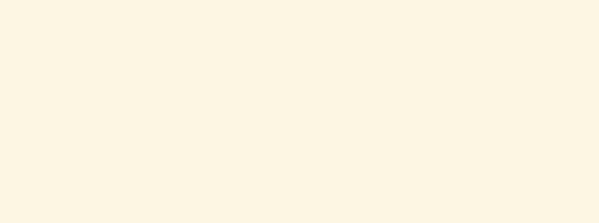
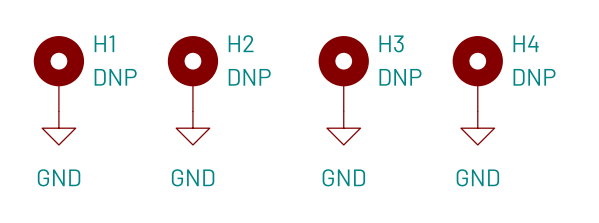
H1: none -> DNP (58, 73)
H2: none -> DNP (192, 73)
H3: none -> DNP (343, 73)
H4: none -> DNP (477, 73)
power symbol: none -> GND (58, 128)
power symbol: none -> GND (192, 128)
power symbol: none -> GND (343, 128)
power symbol: none -> GND (477, 128)

